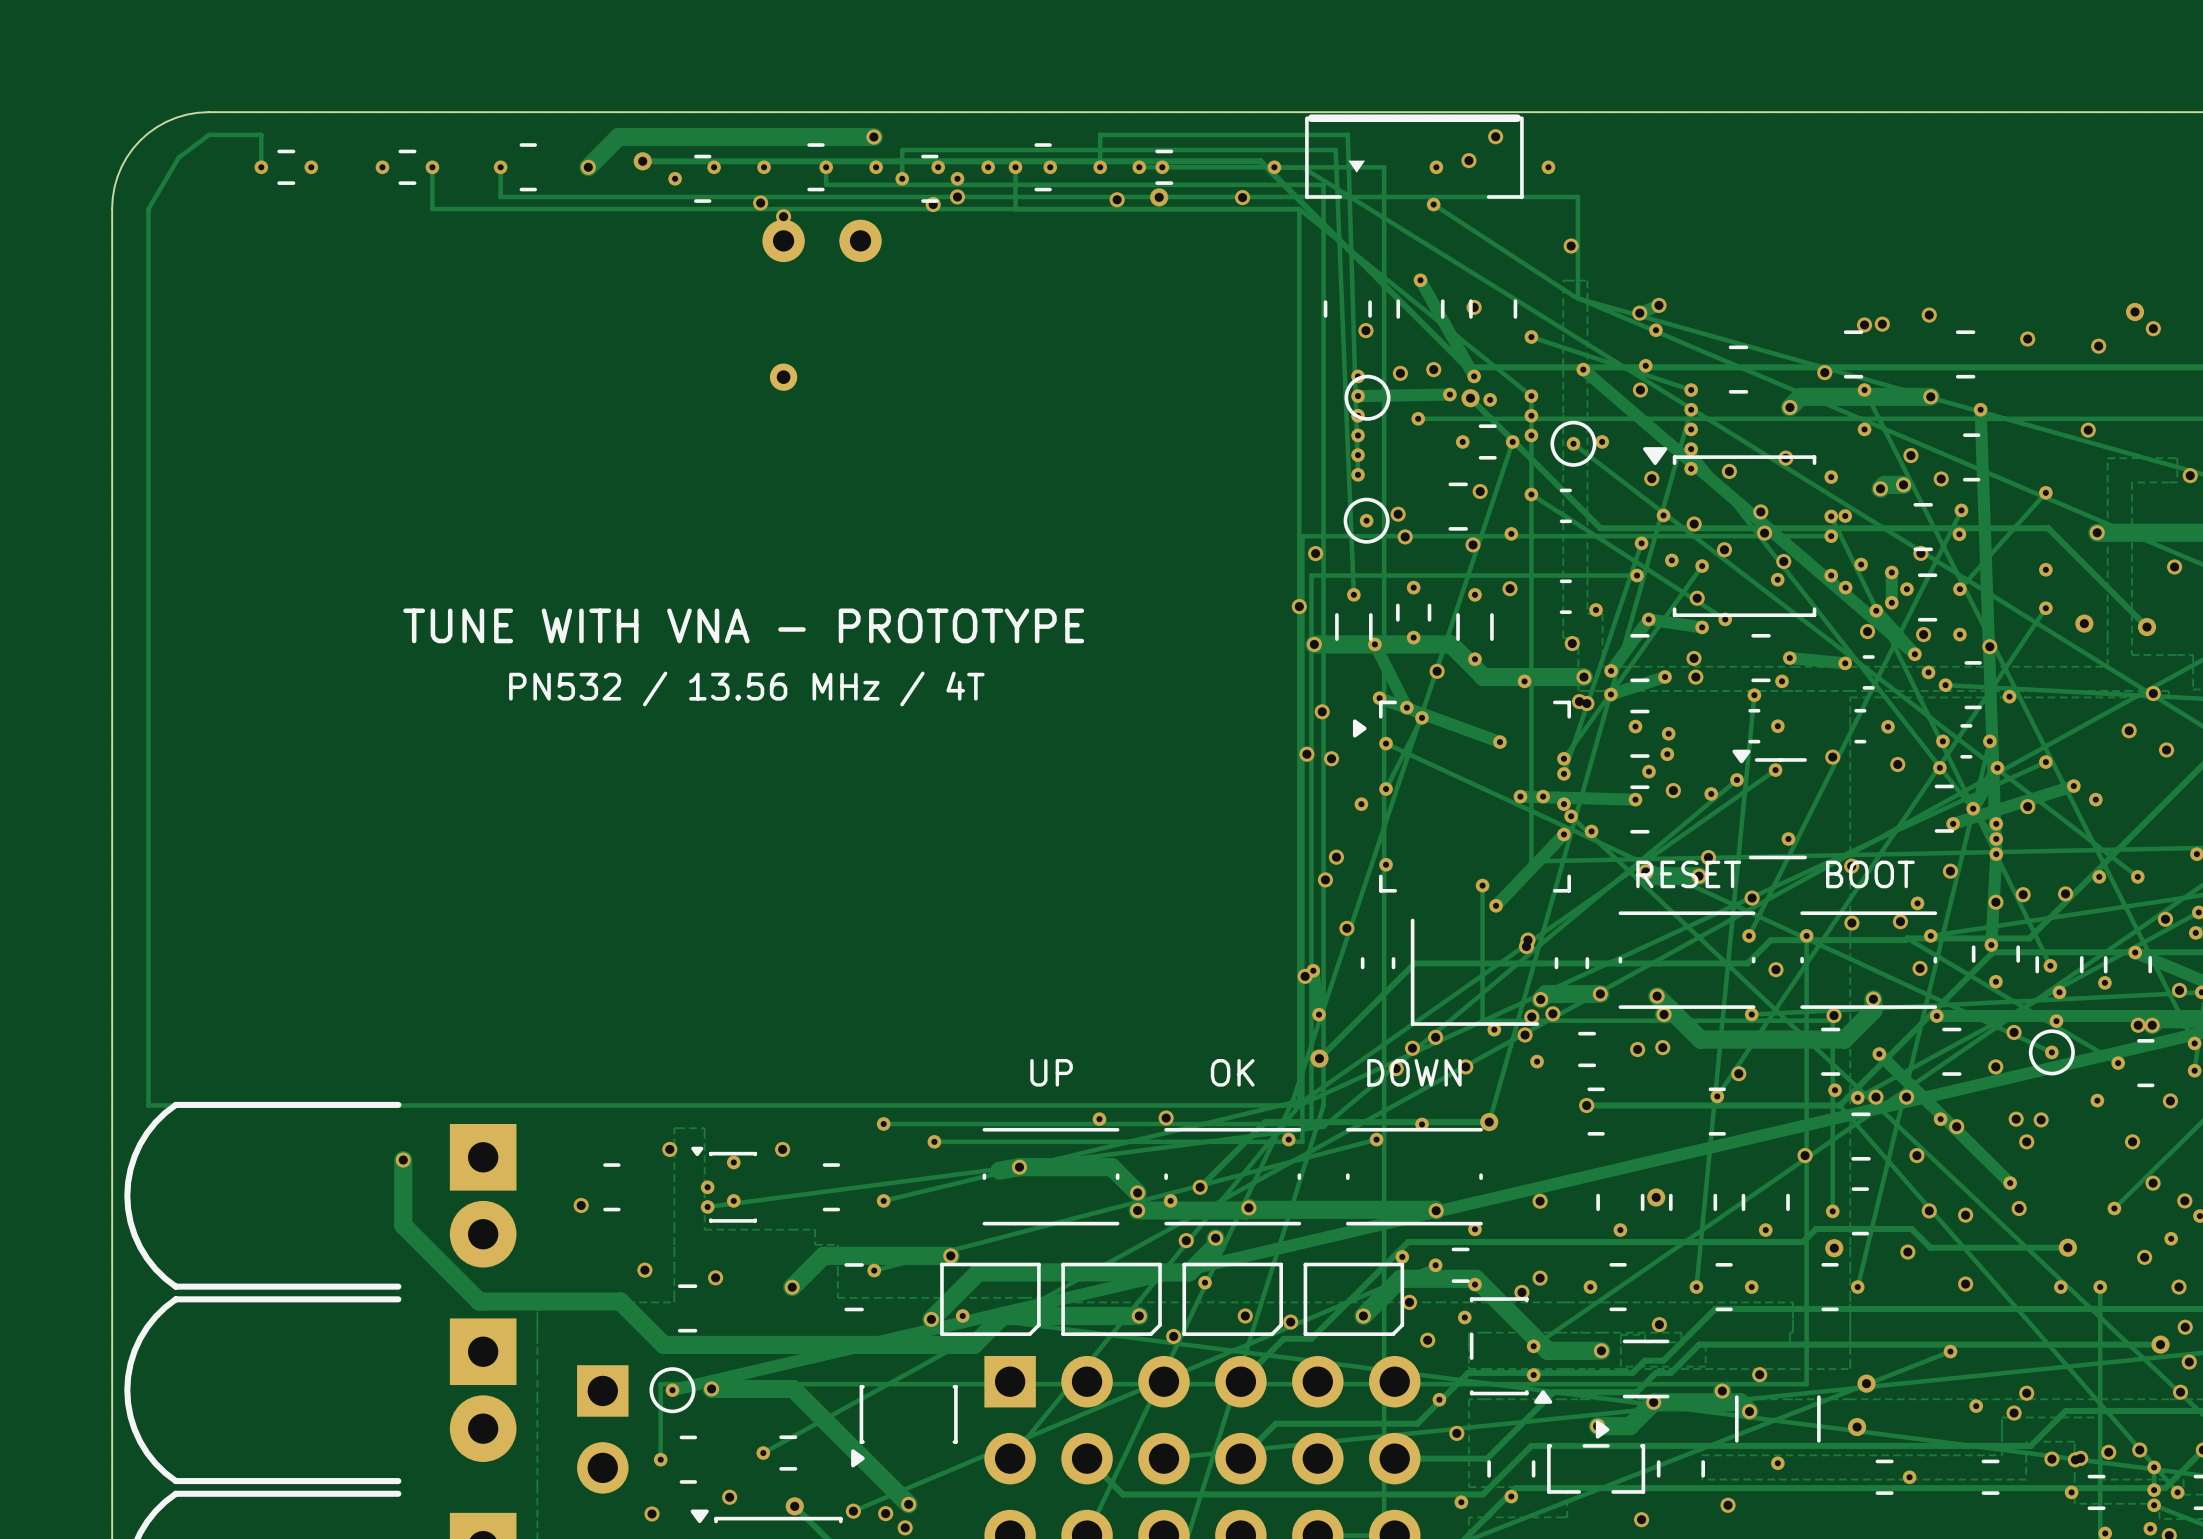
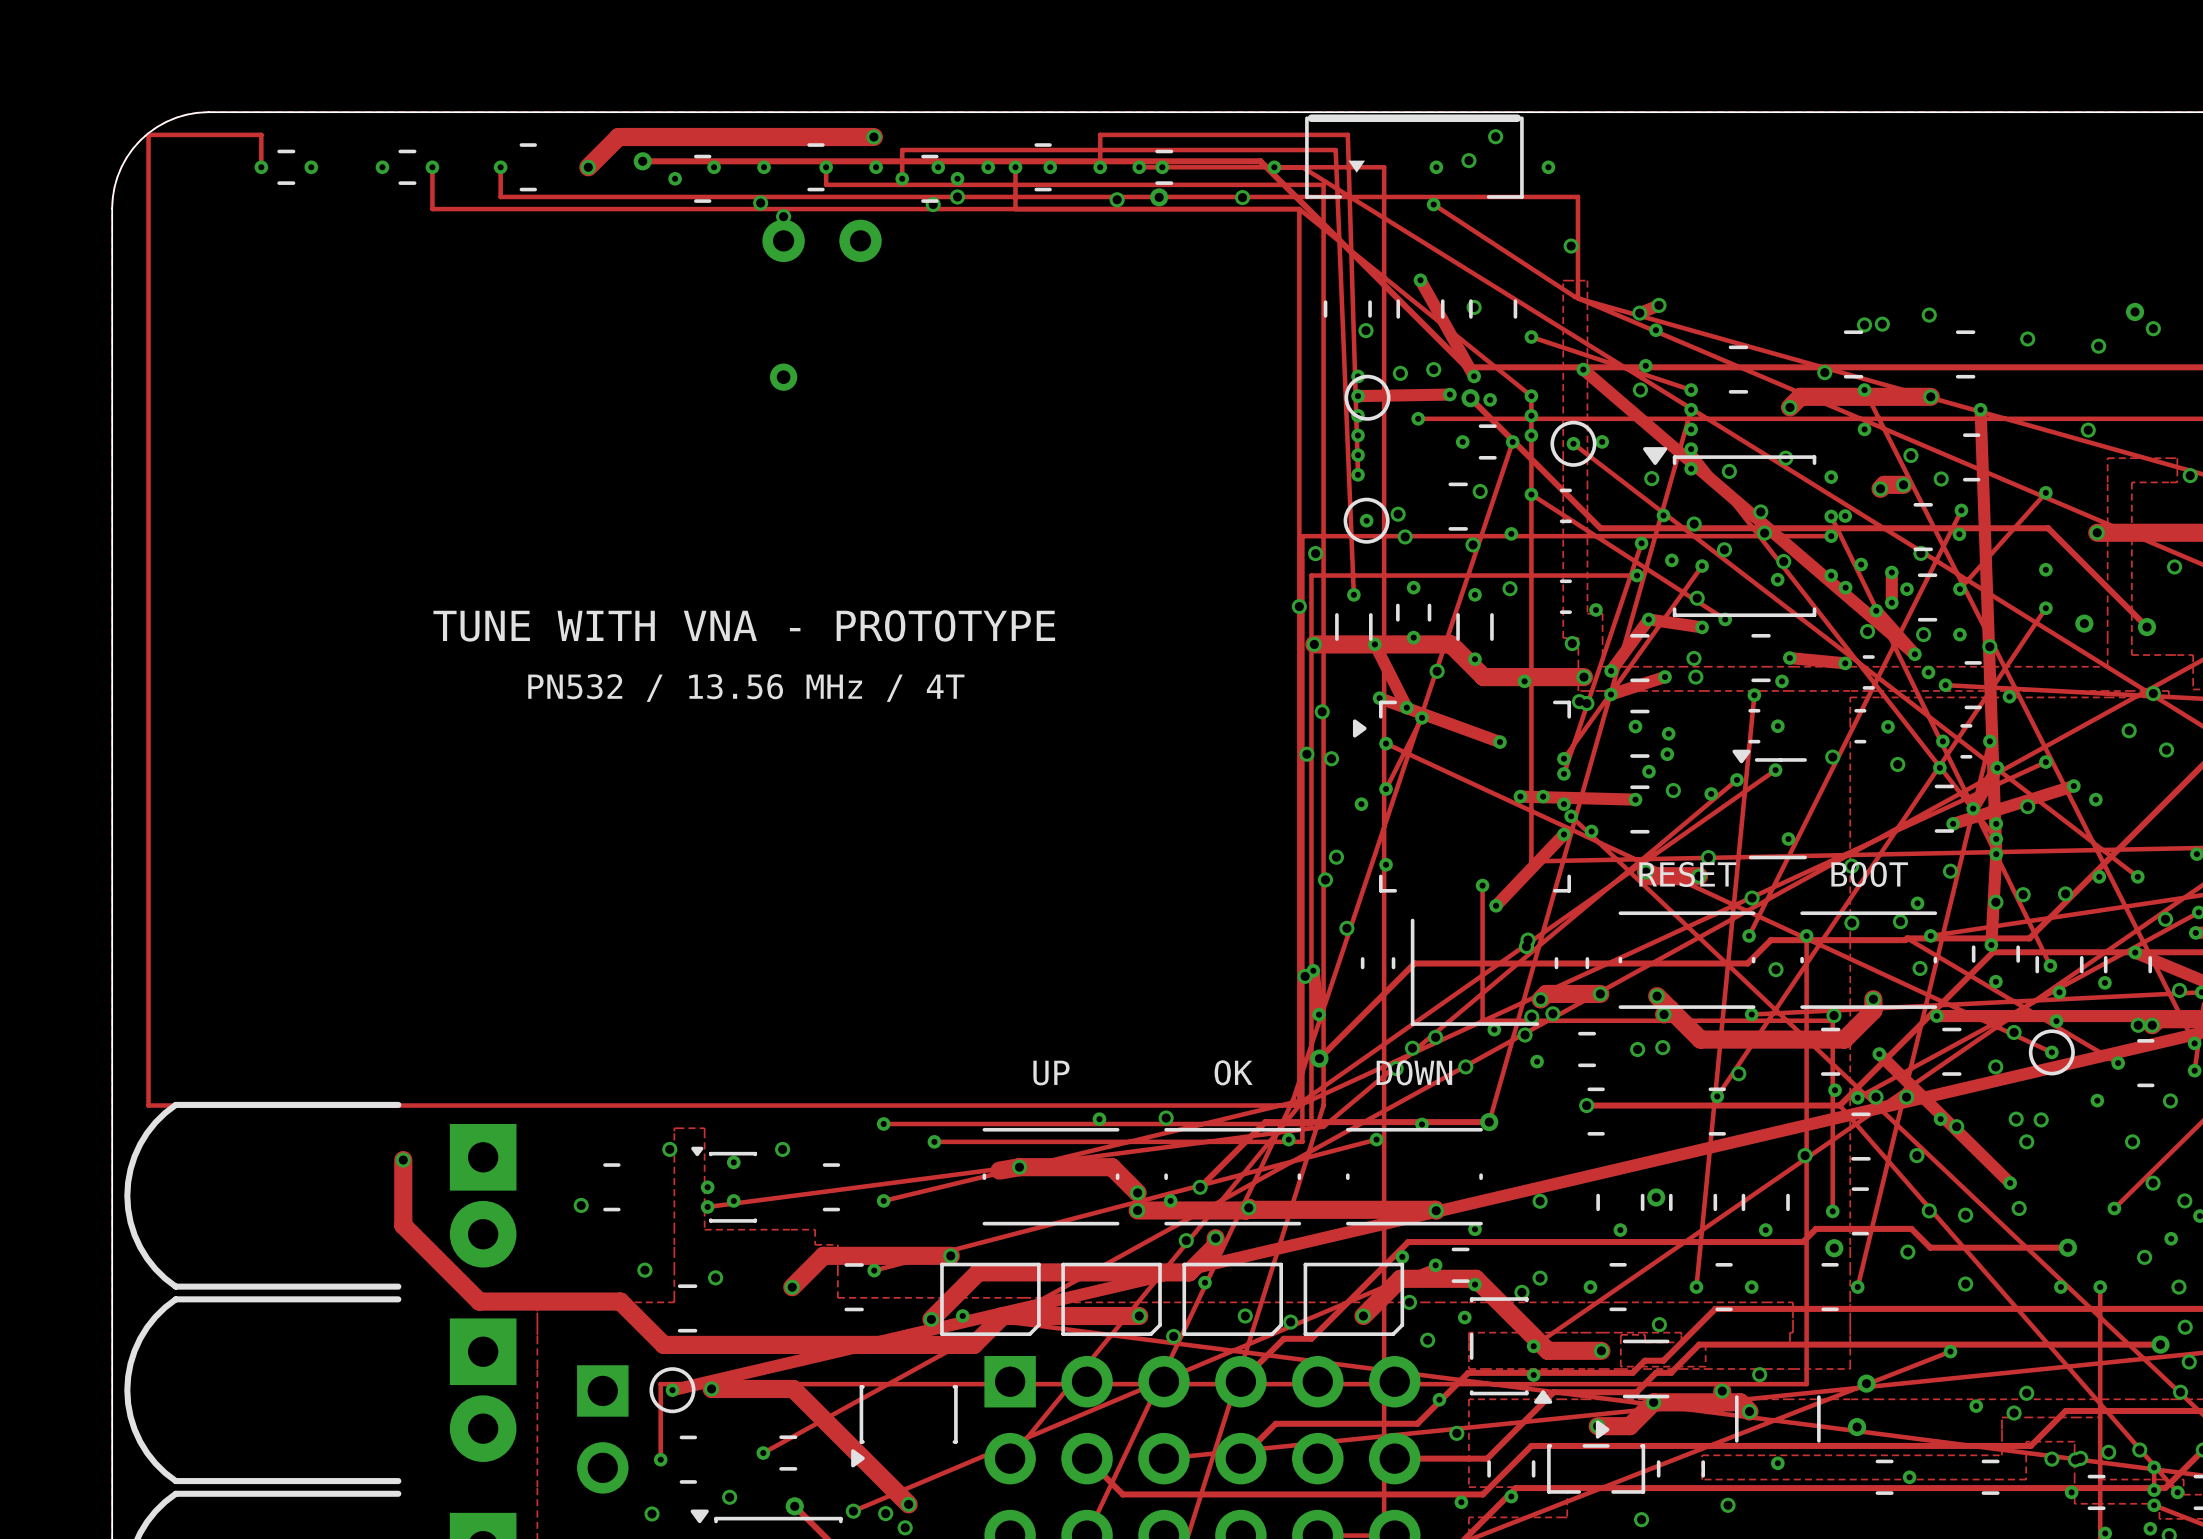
track: (209, 134) (178, 157) (148, 209) -> (209, 134) (148, 134) (148, 209)

